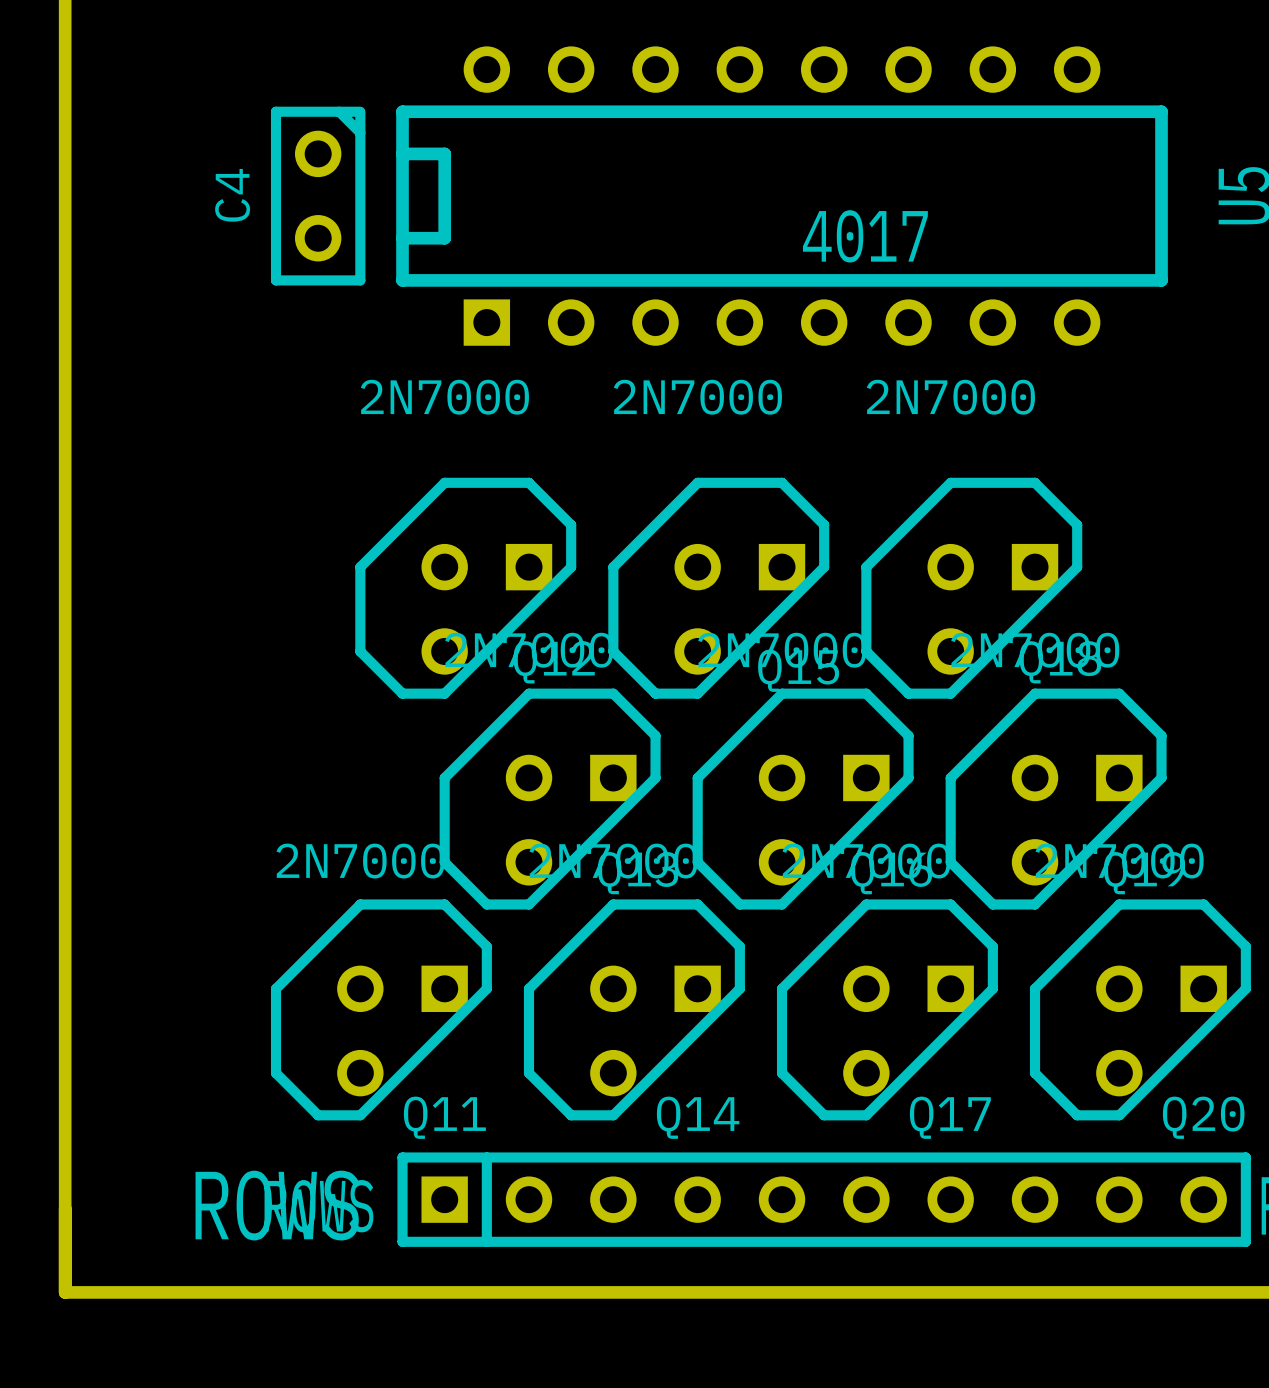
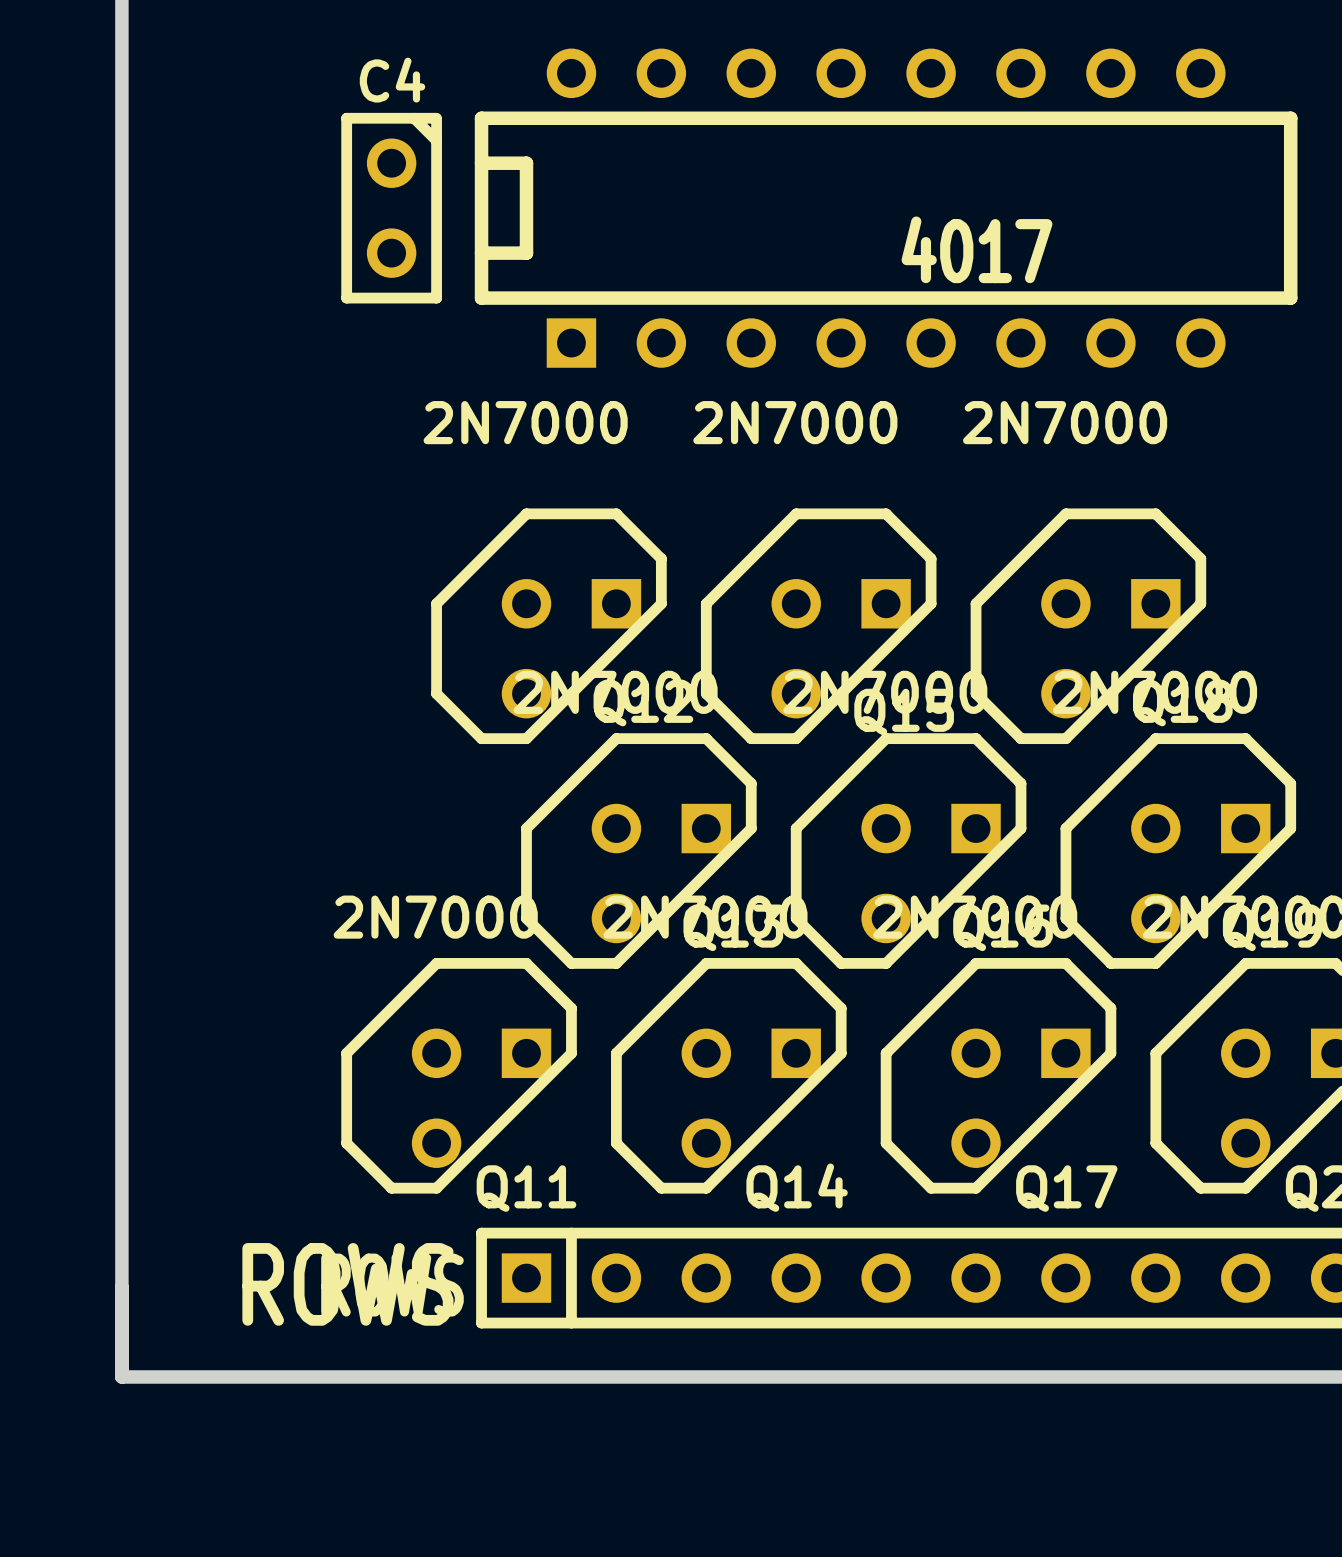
C4 name rotation: 0° (232, 195) -> 90° clockwise (392, 80)
C4 name position: C4 (232, 195) -> C4 (392, 80)

